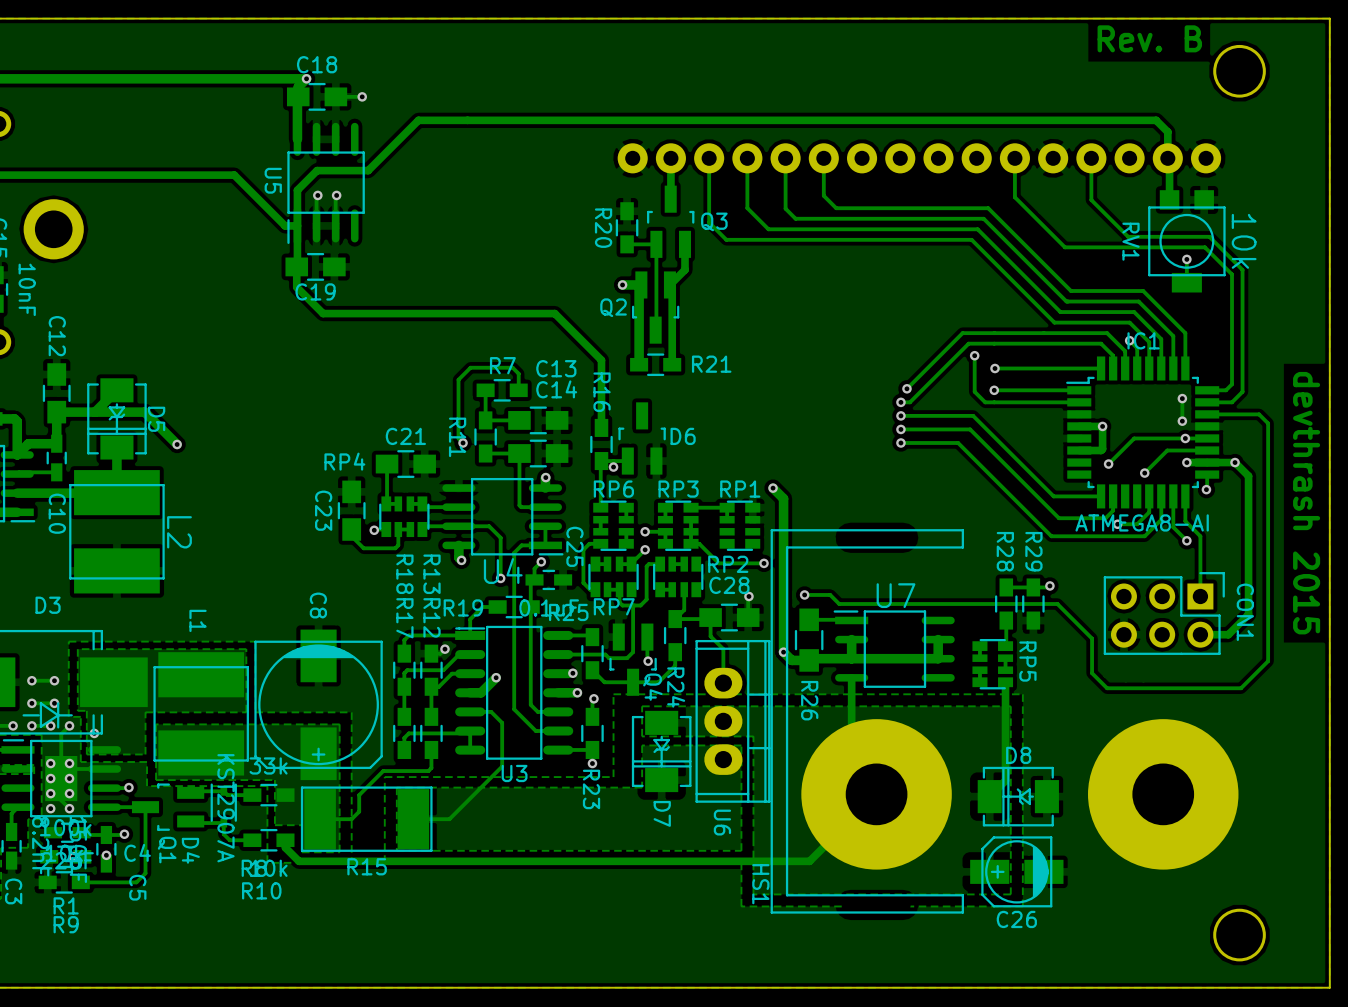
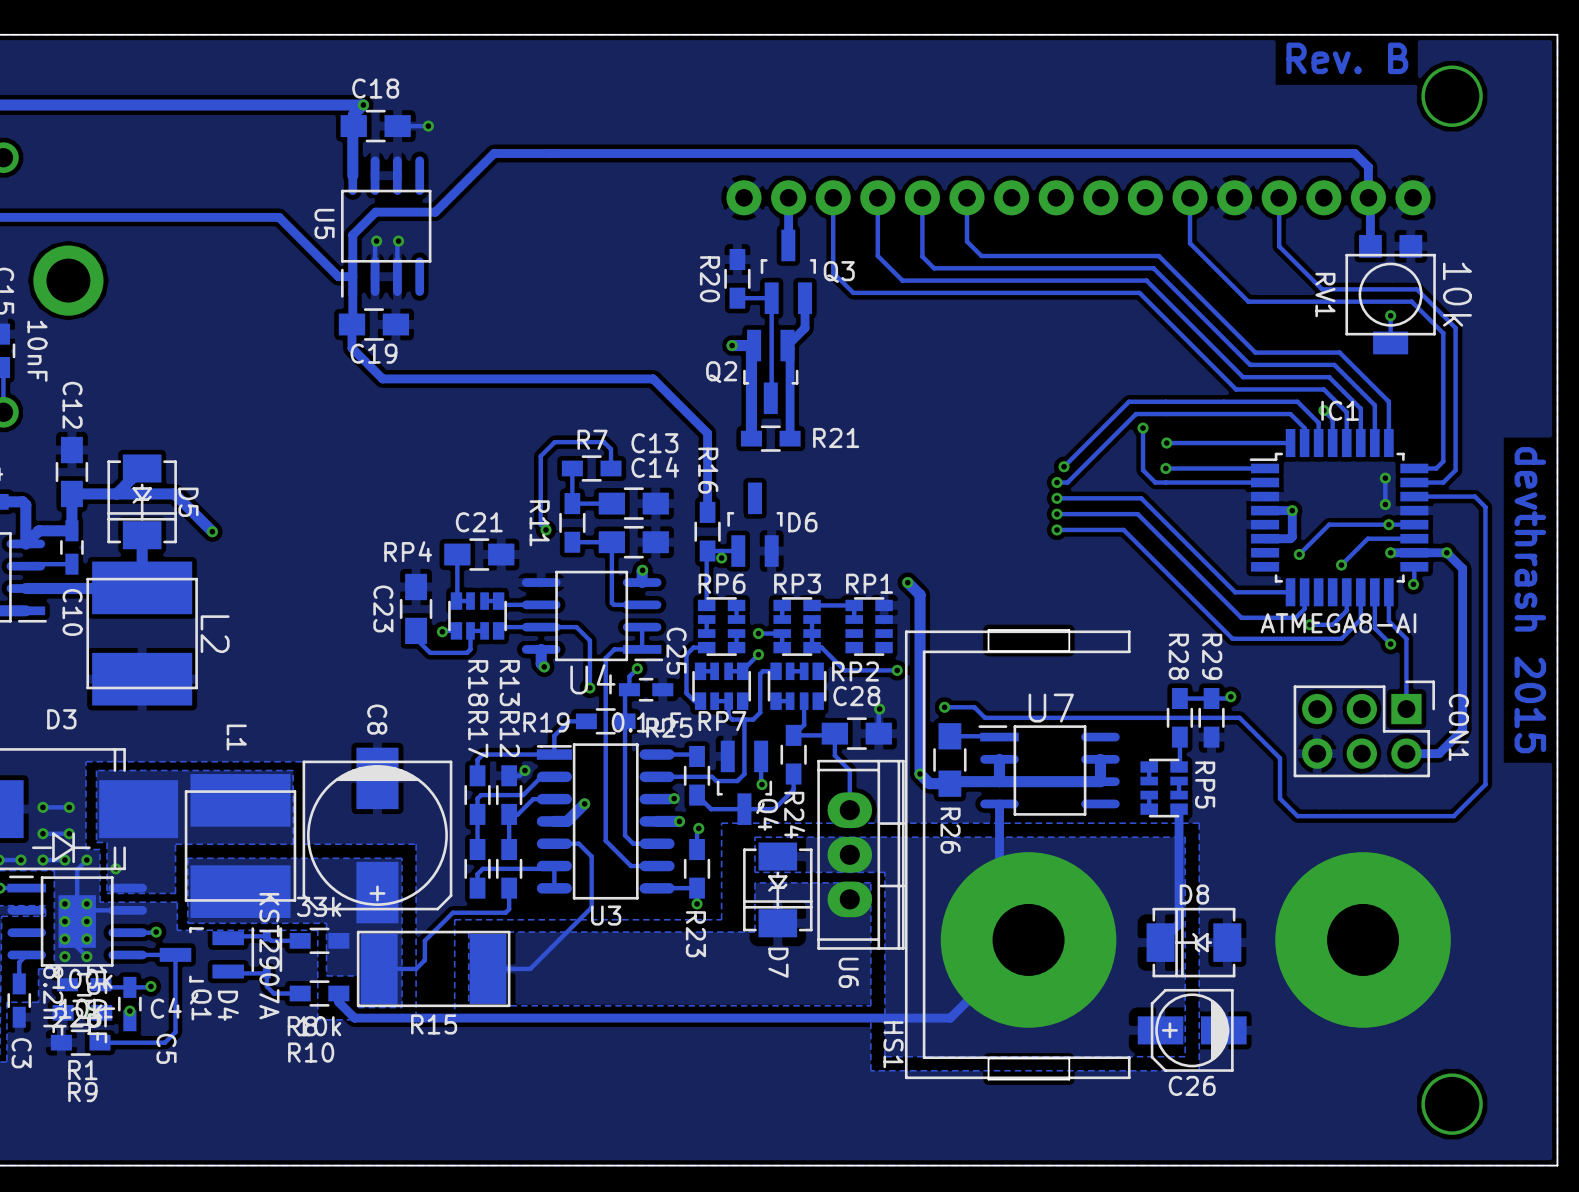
board edge: none -> (1069, 630) (1069, 651) (988, 651) (988, 630) (1069, 630)
HS1 footprint: [770, 529, 965, 914] -> [904, 630, 1131, 1080]
board edge: none -> (1069, 1058) (1069, 1079) (988, 1079) (988, 1058) (1069, 1058)

